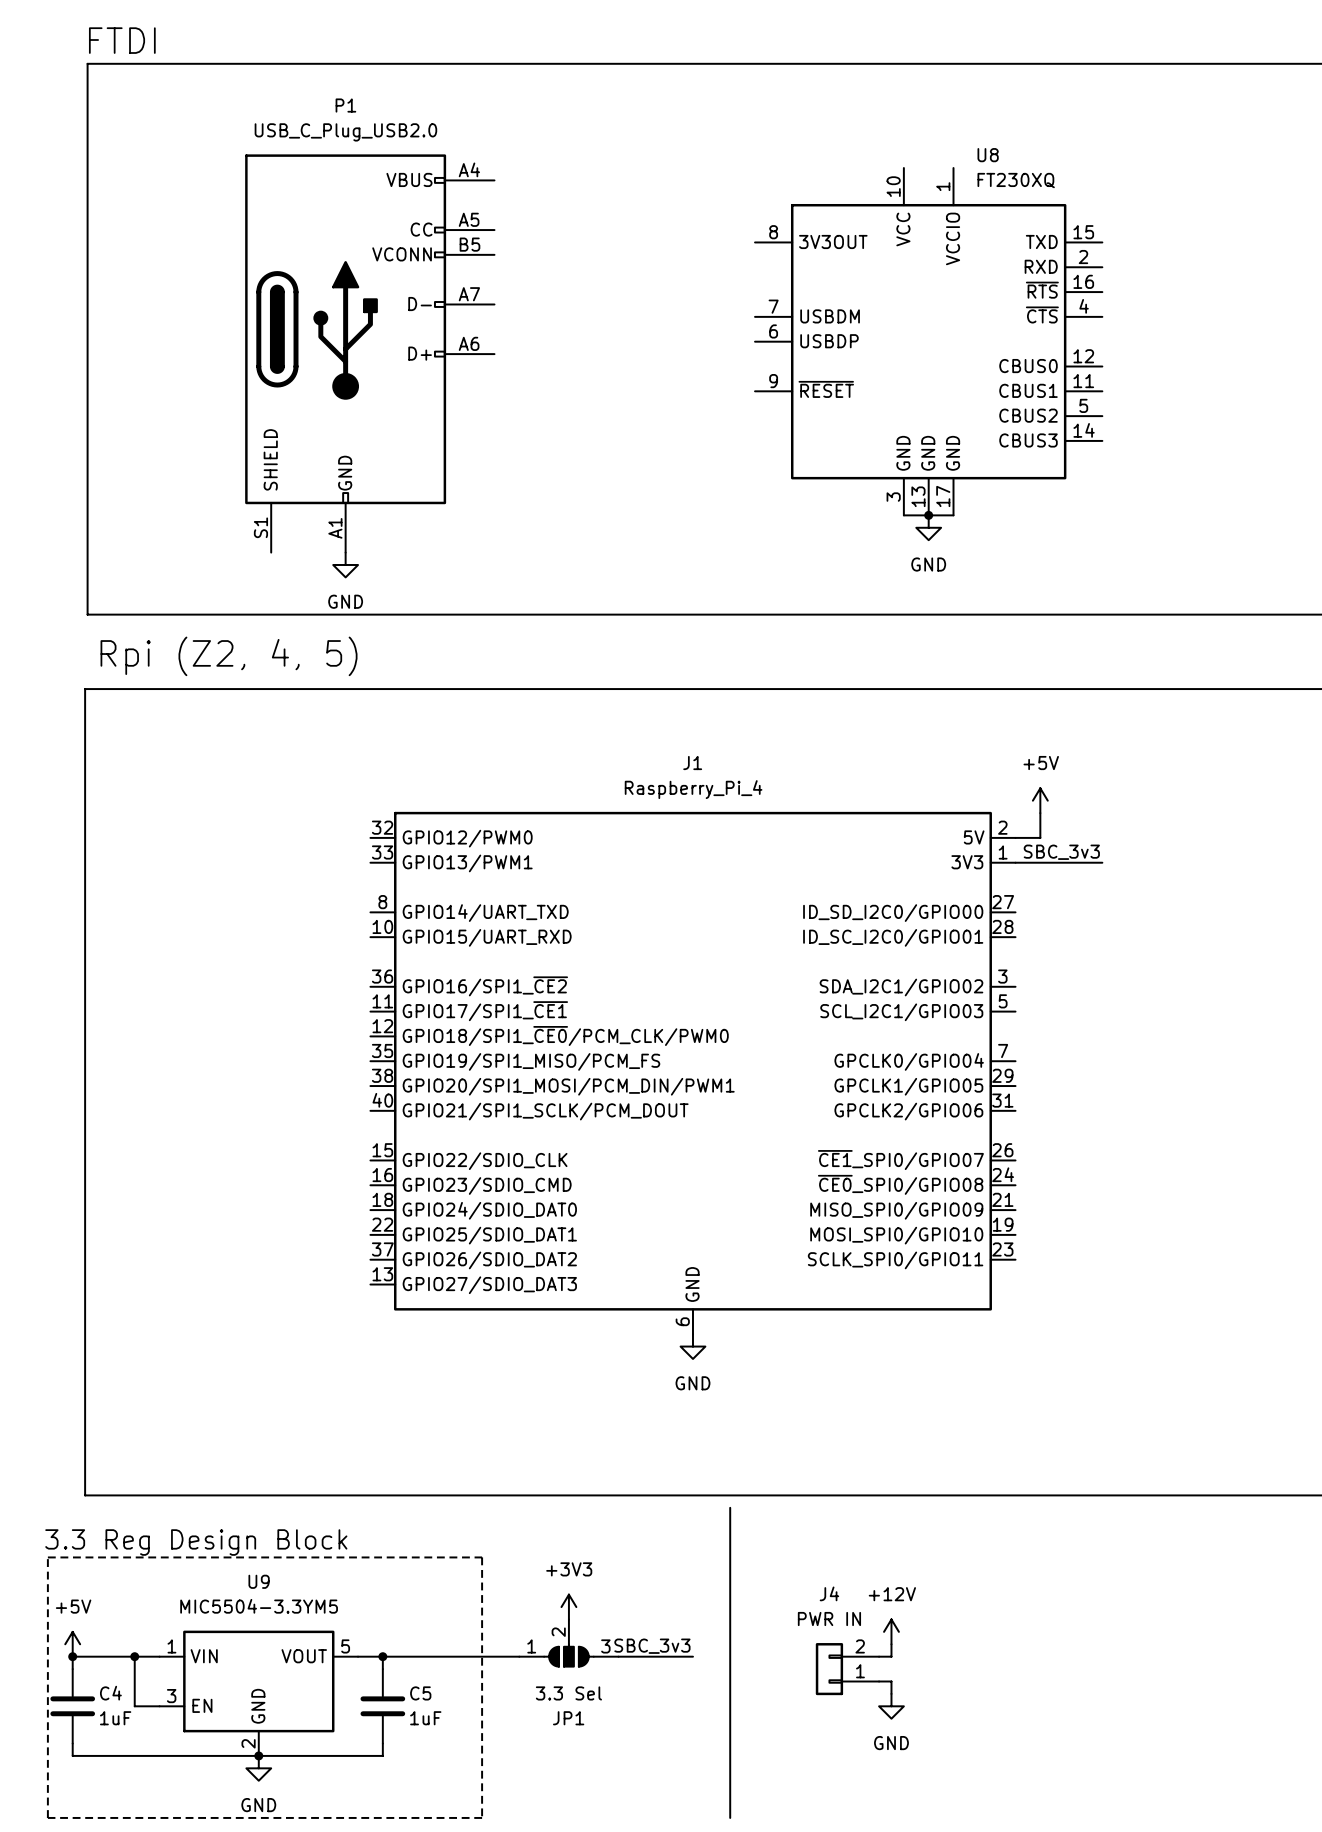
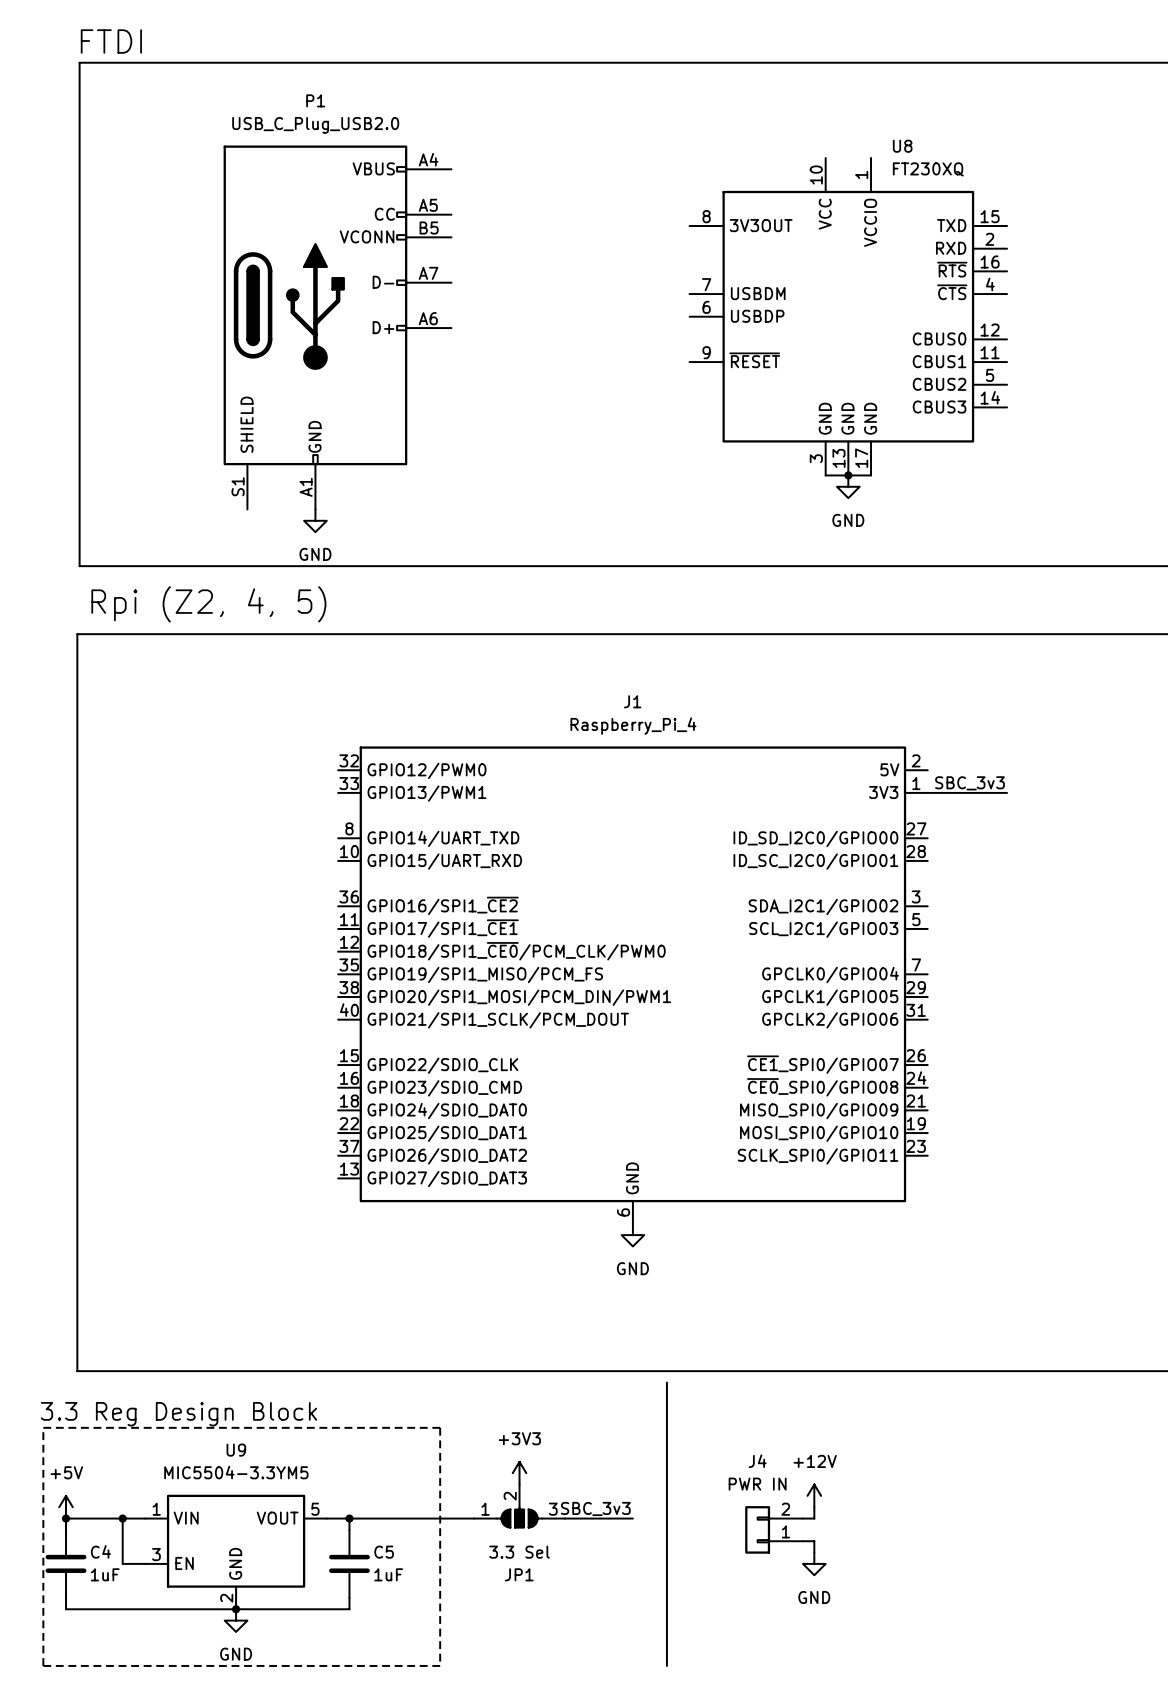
power symbol: +5V (1040, 800) -> none
wire: (1040, 813) (1040, 837) (1015, 837) -> none

